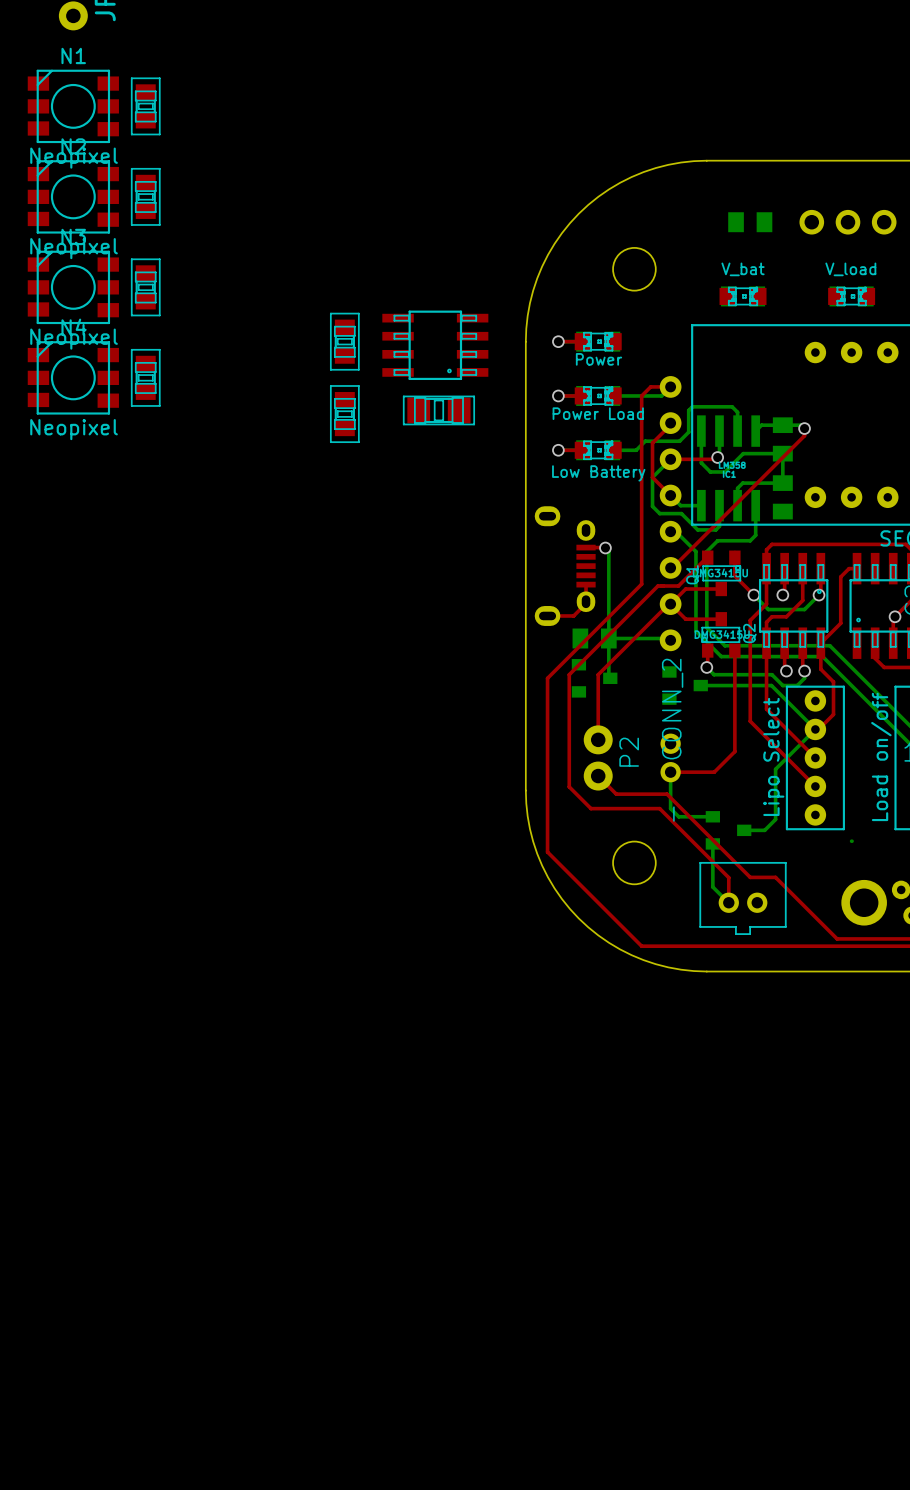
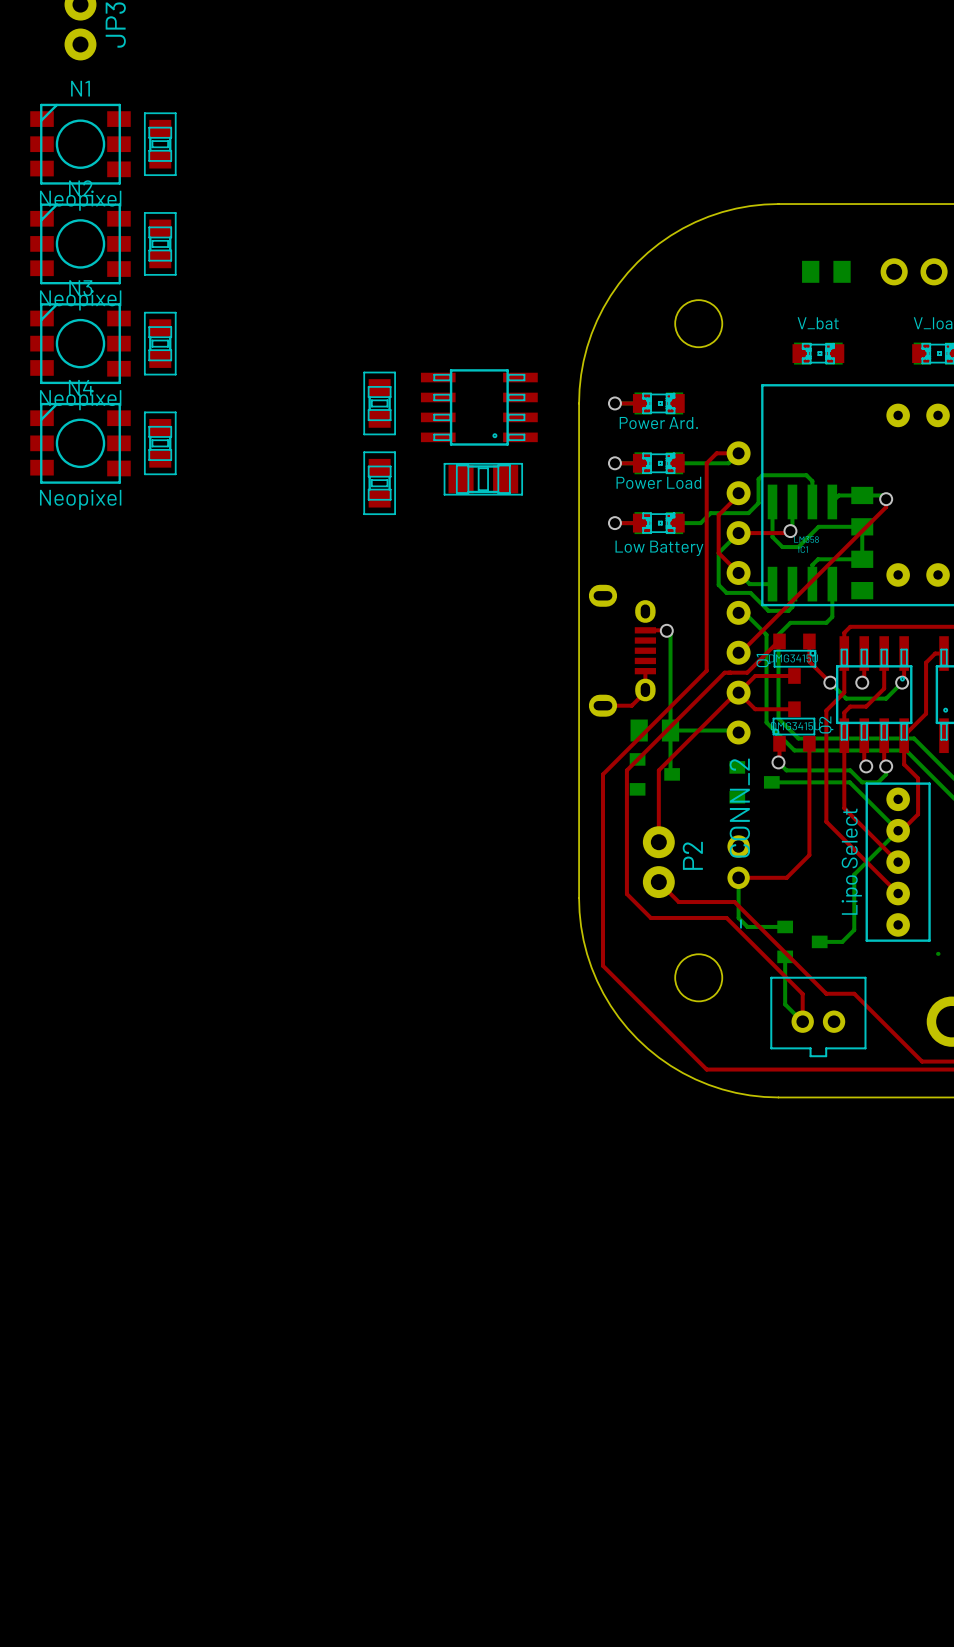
part value: Power (599, 359) -> Power Ard. (658, 423)

